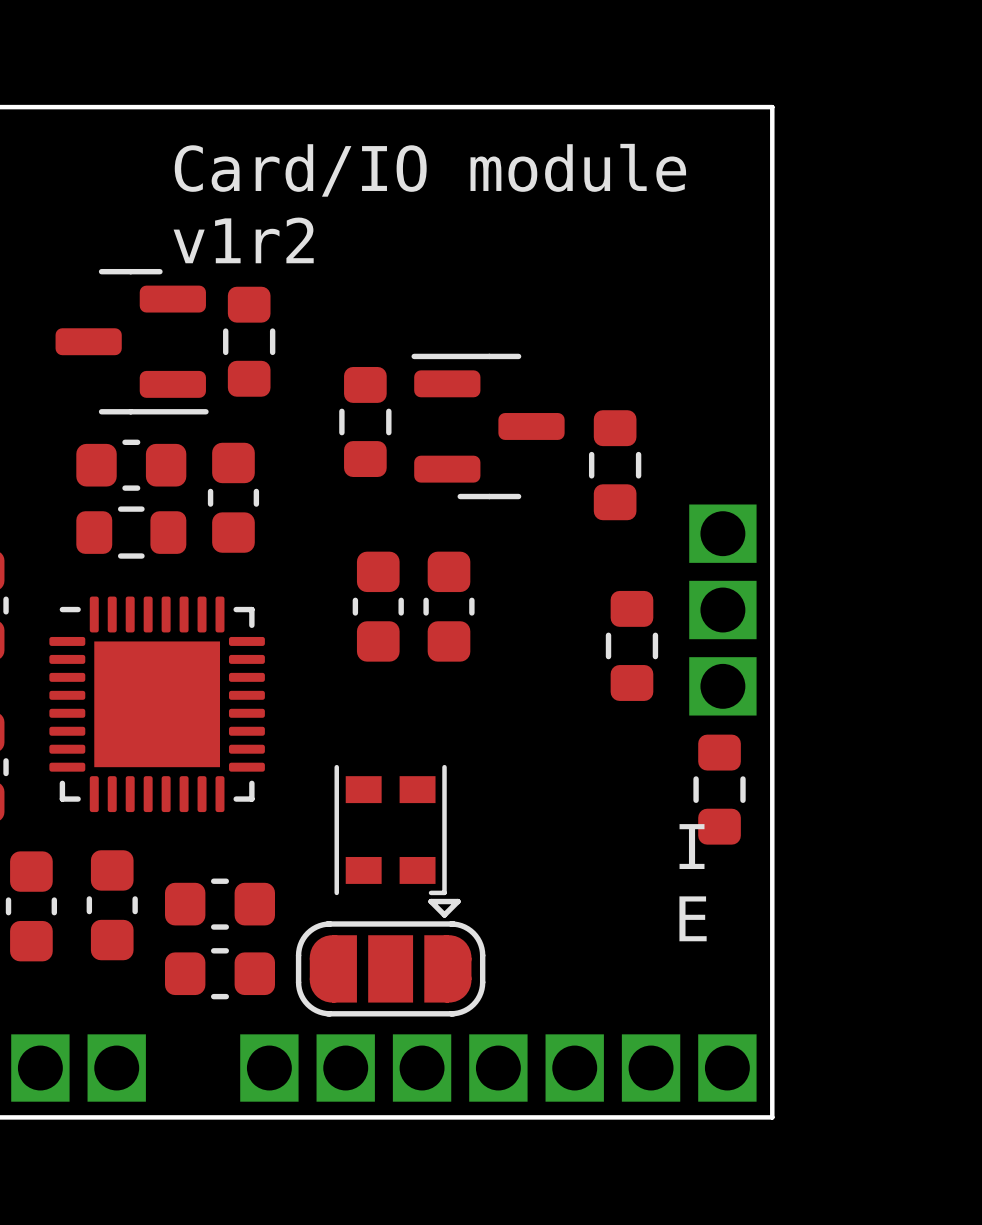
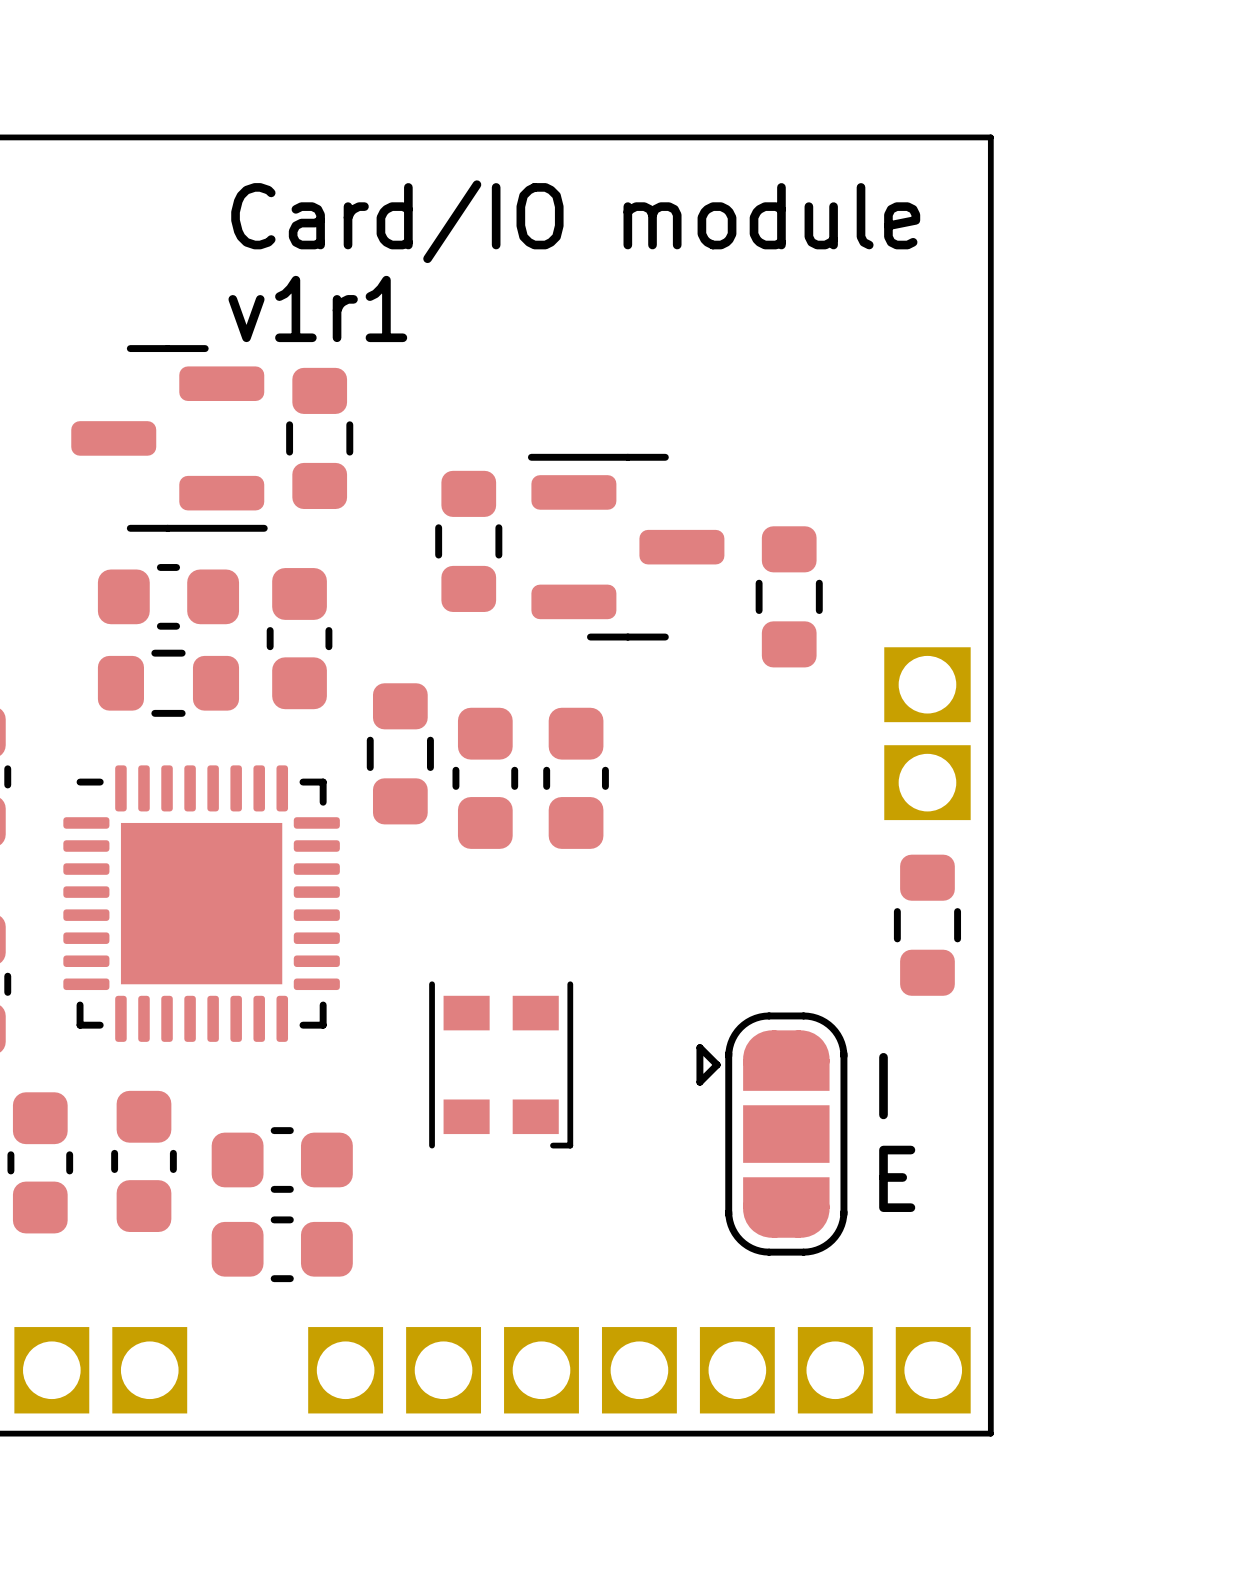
text: v1r2 (243, 240) -> v1r1 (317, 308)
part: none -> (400, 753)
part: (631, 645) -> none
part: (722, 686) -> none
part: none -> (927, 925)
part: (719, 789) -> none
part rotation: 0° (390, 957) -> 90° counterclockwise (771, 1134)
part position: (390, 957) -> (771, 1134)

